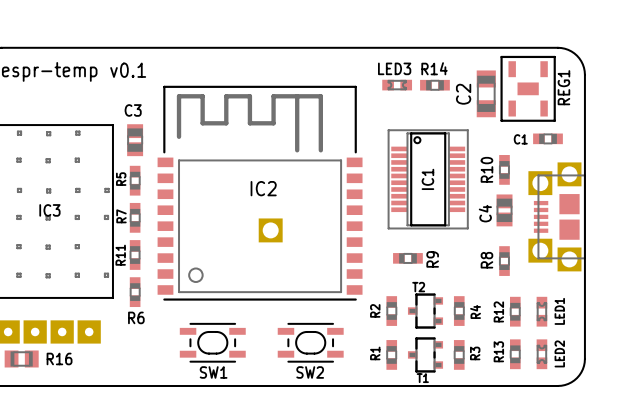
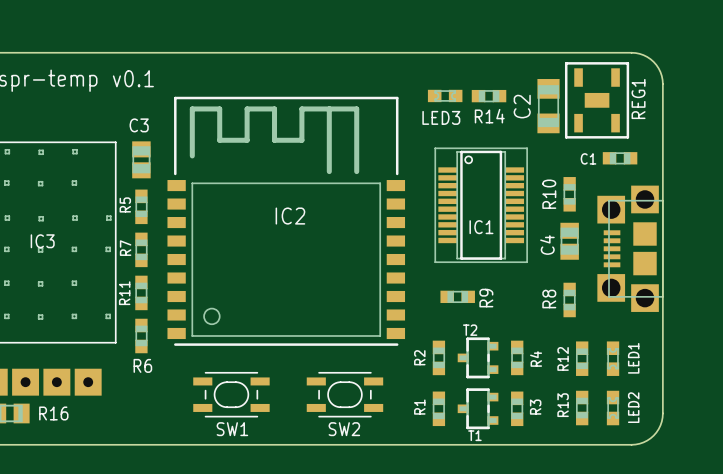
LED3 name position: LED3 (394, 68) -> LED3 (441, 117)
R14 name position: R14 (434, 68) -> R14 (489, 116)
IC2 footprint: [157, 85, 363, 301] -> [167, 96, 406, 346]
IC1 name rotation: 0° (427, 179) -> 90° clockwise (481, 227)

